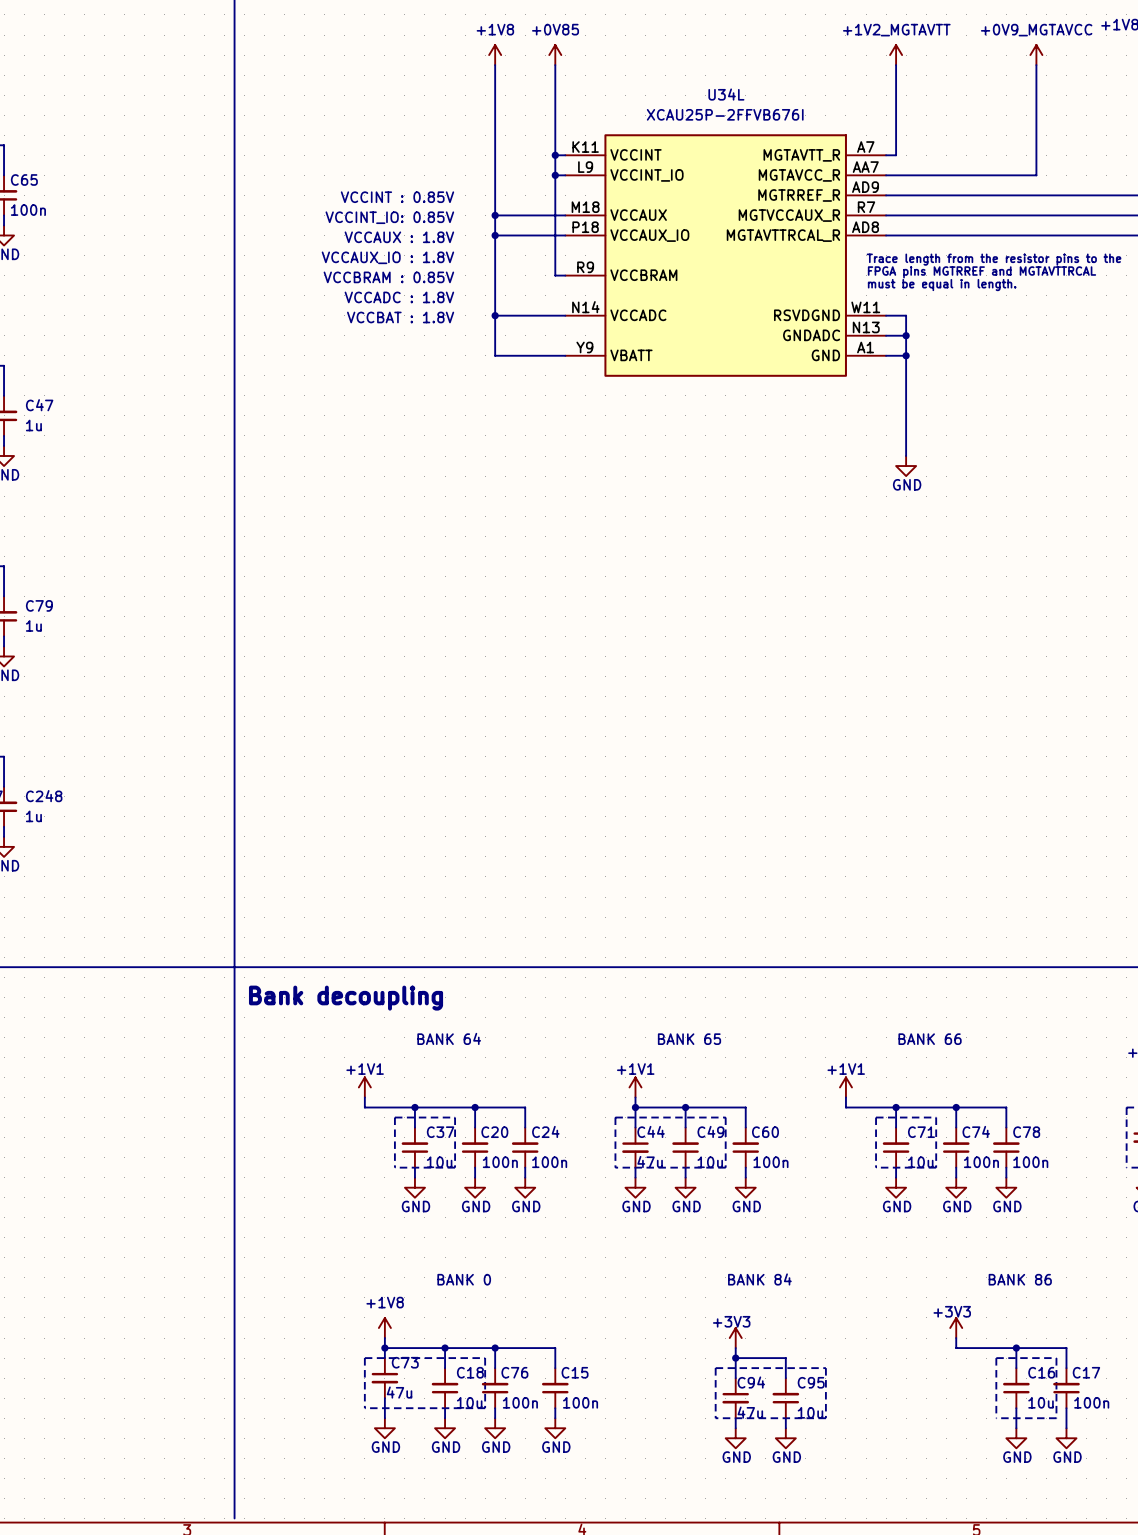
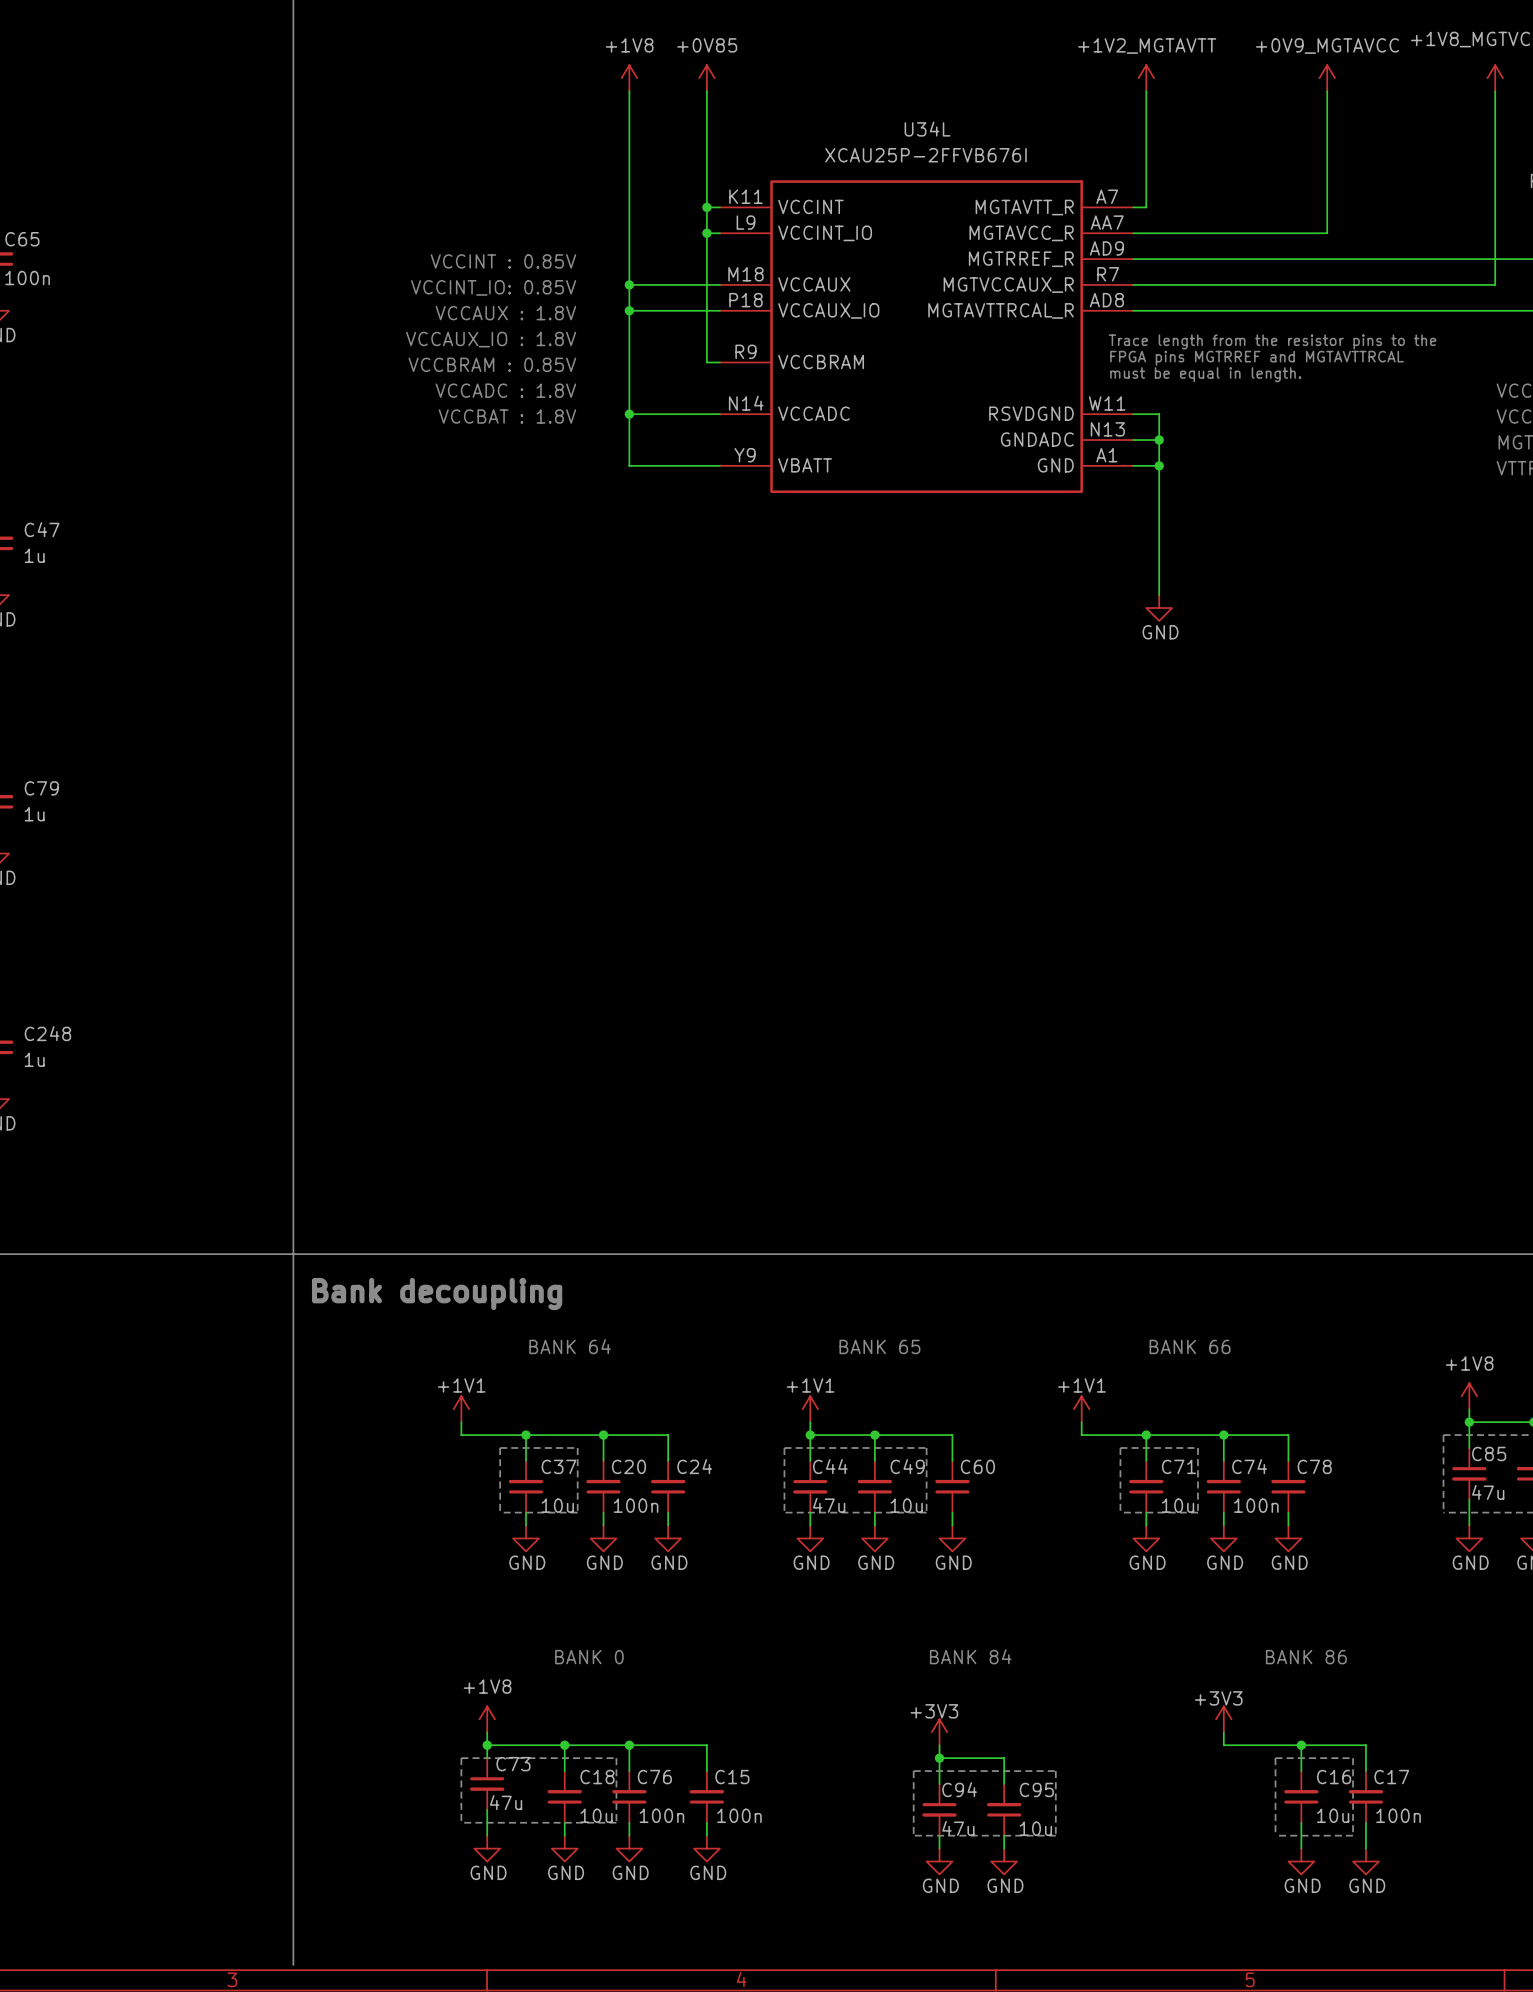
C24 text: 100n (549, 1162) -> none
C60 text: 100n (770, 1162) -> none
C78 text: 100n (1030, 1162) -> none

